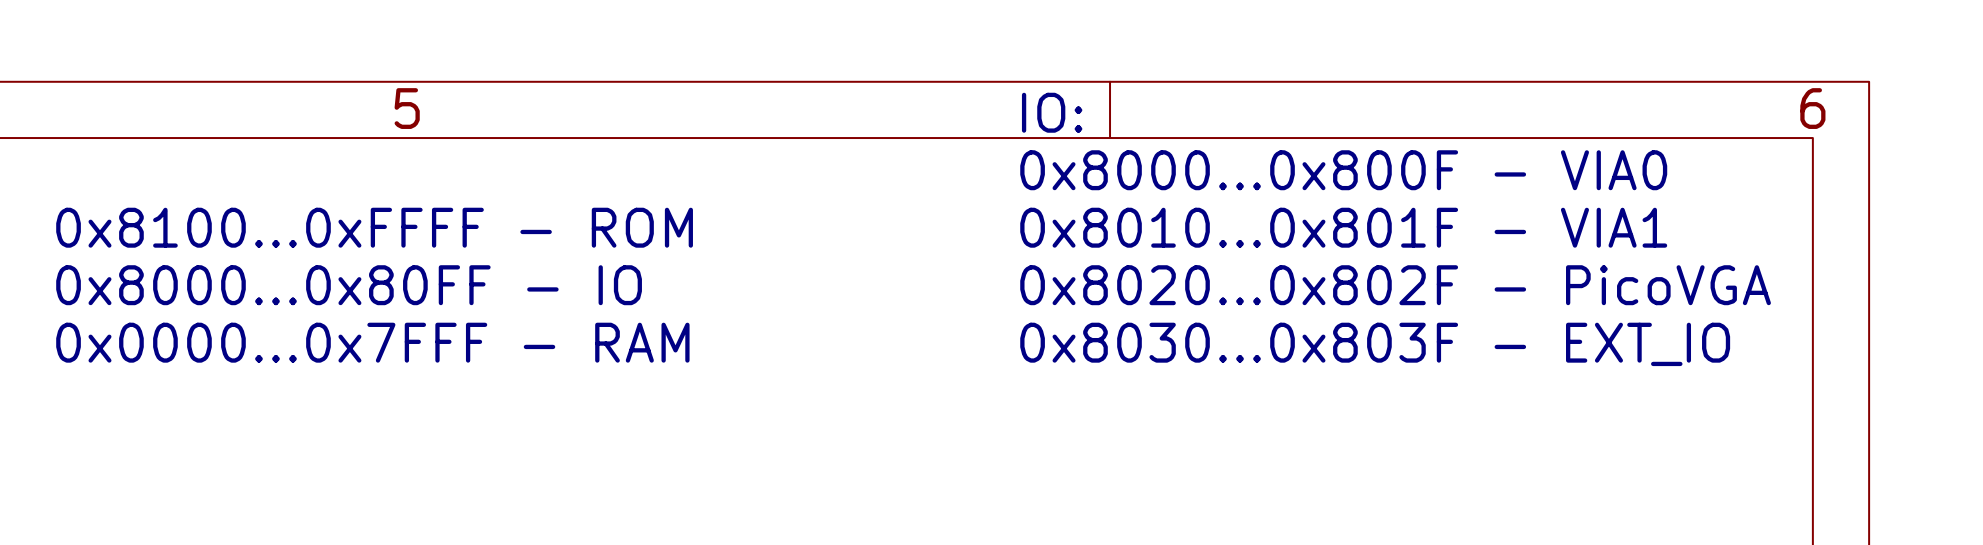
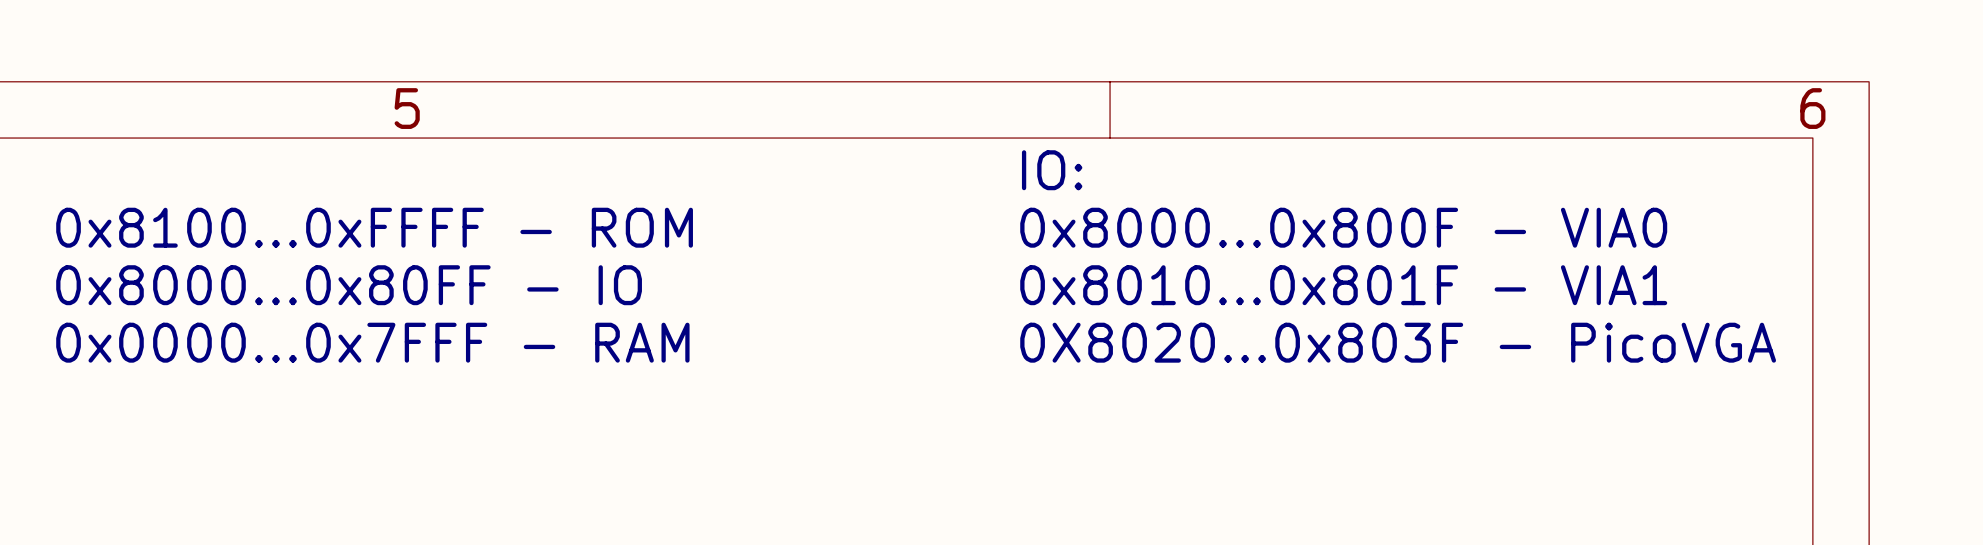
text: IO: (1052, 112) -> none
text: 0x8000...0x800F - VIA0 (1343, 170) -> IO: (1052, 170)
text: 0x8010...0x801F - VIA1 (1343, 227) -> 0x8000...0x800F - VIA0 (1343, 227)
text: 0x8020...0x802F - PicoVGA (1395, 285) -> 0x8010...0x801F - VIA1 (1343, 285)
text: 0x8030...0x803F - EXT_IO (1375, 344) -> 0X8020...0x803F - PicoVGA (1398, 342)

